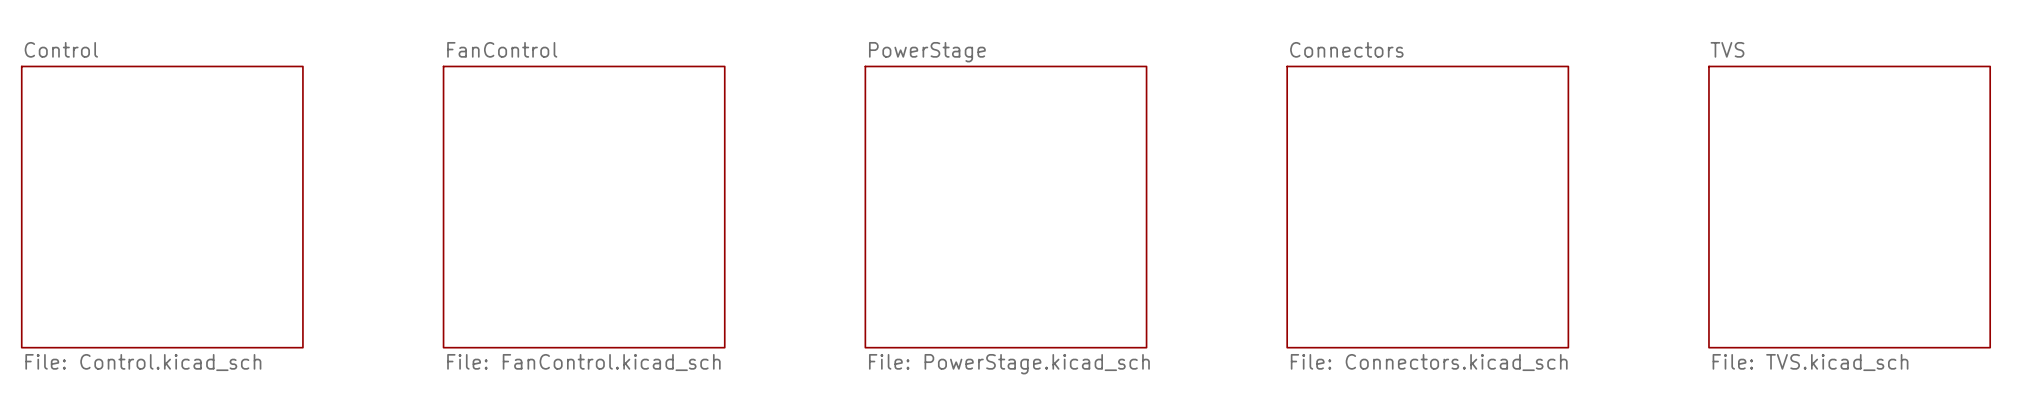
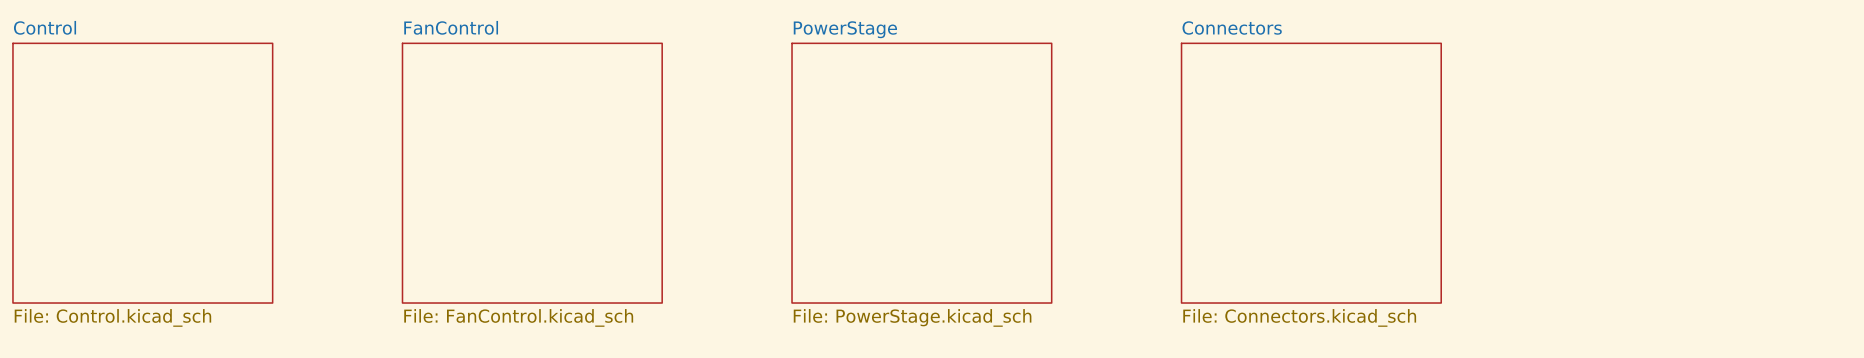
sheet TVS: File: TVS.kicad_sch (1849, 207) -> none

